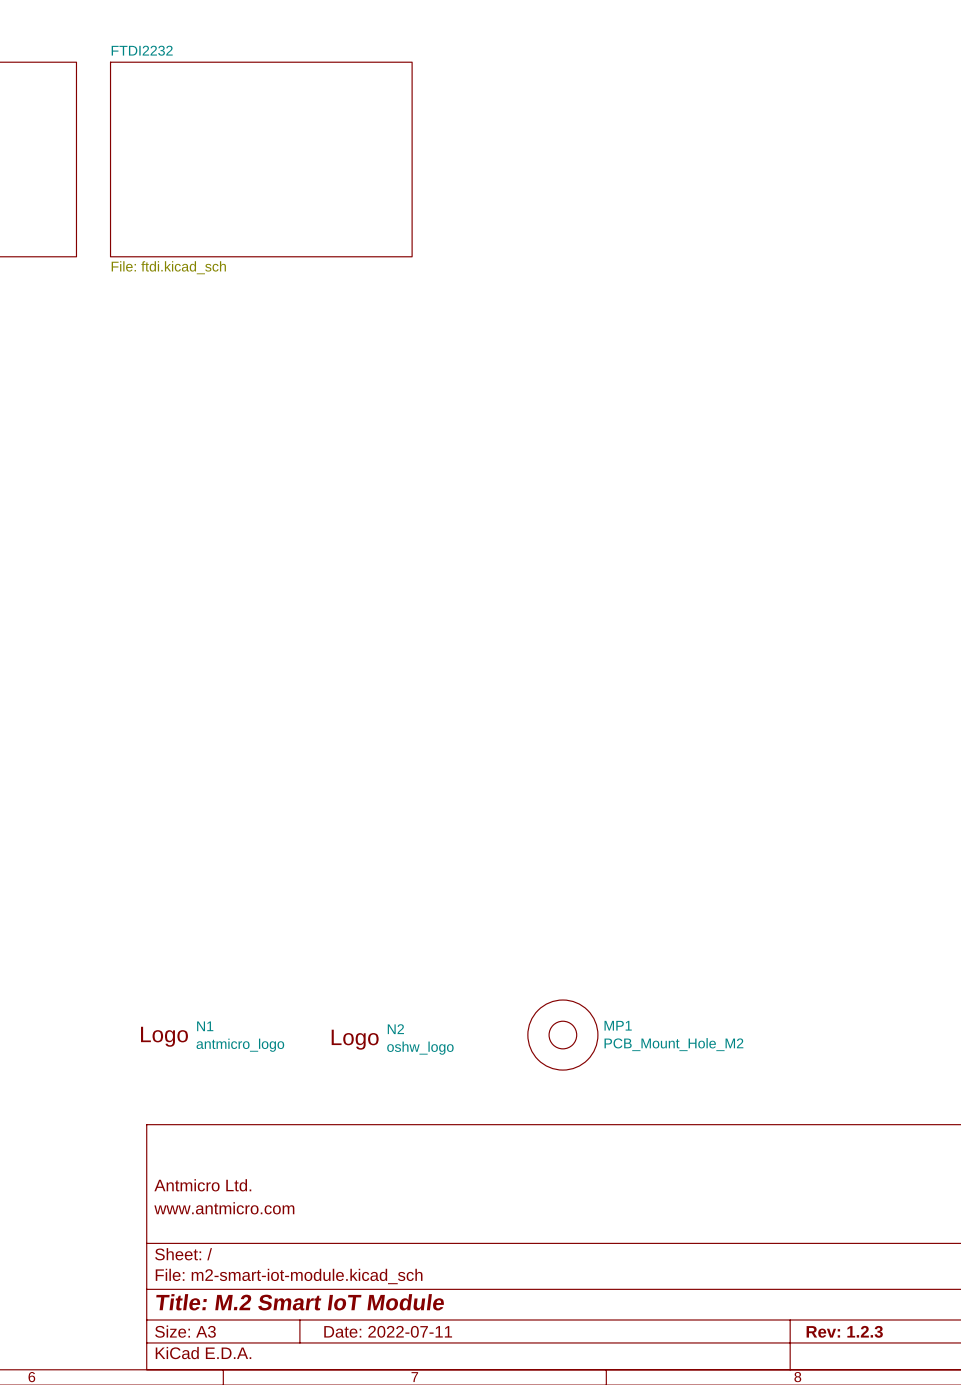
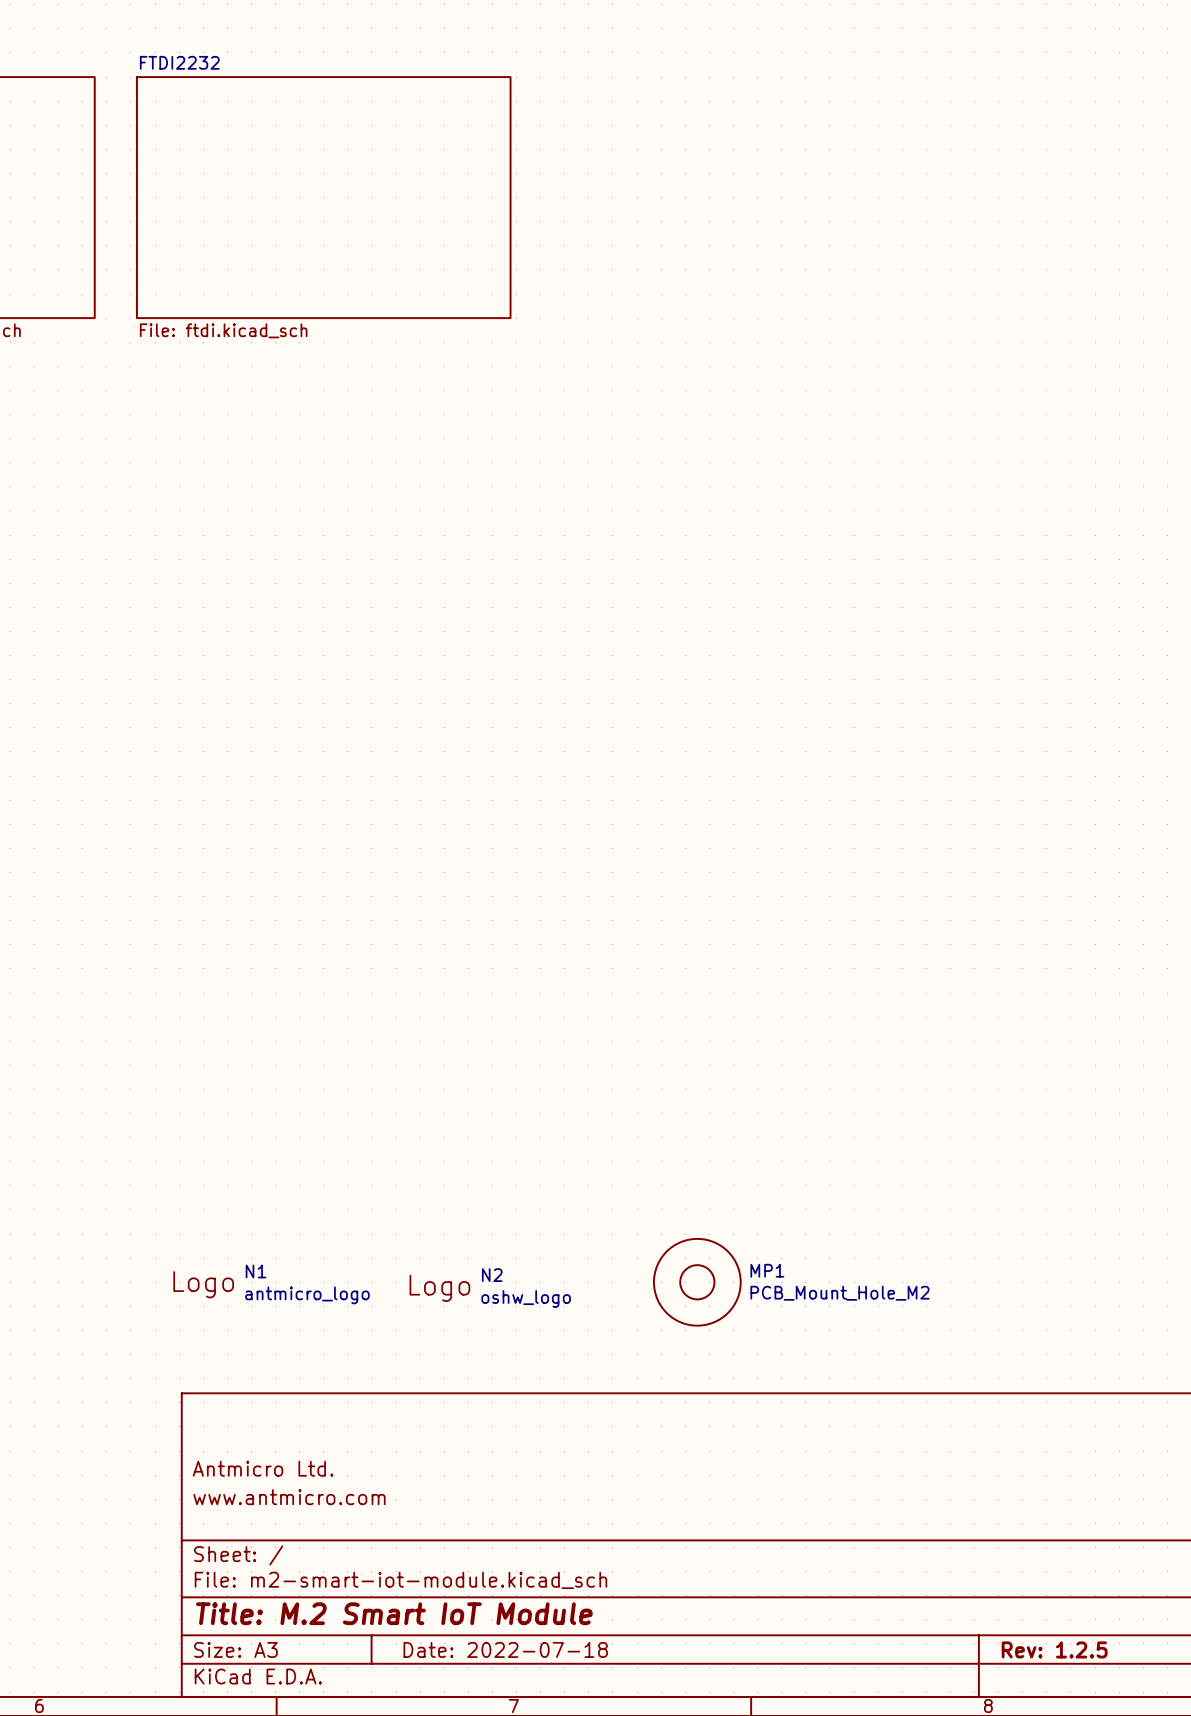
title block: Date: 2022-07-11 (388, 1331) -> Date: 2022-07-18 (505, 1649)
title block: Rev: 1.2.3 (844, 1331) -> Rev: 1.2.5 (1054, 1649)

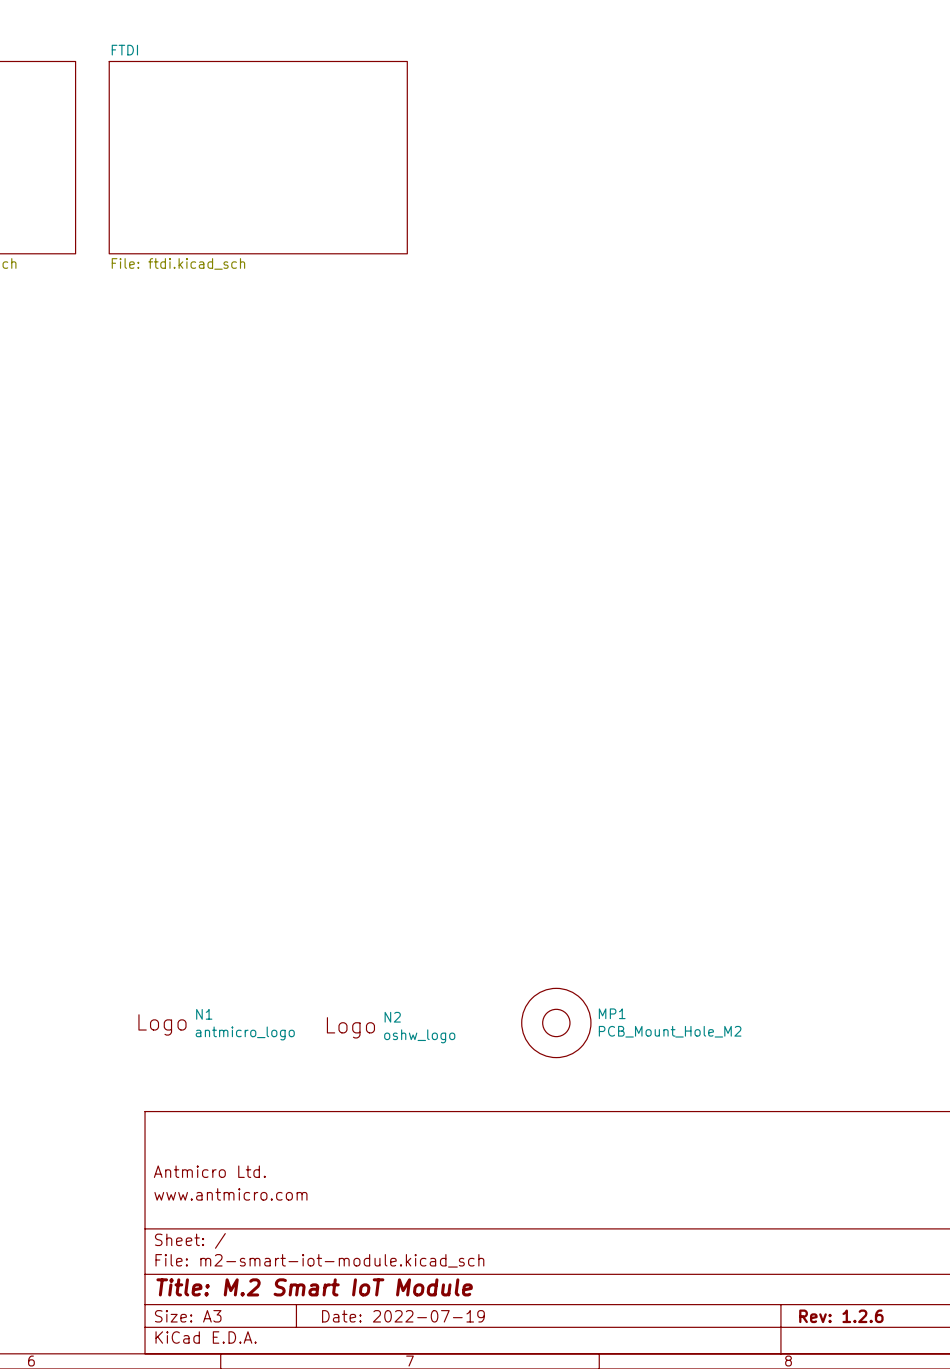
sheet FTDI2232 name: FTDI2232 (179, 62) -> FTDI (124, 50)
title block: Date: 2022-07-18 (505, 1649) -> Date: 2022-07-19 (403, 1316)
title block: Rev: 1.2.5 (1054, 1649) -> Rev: 1.2.6 (841, 1316)

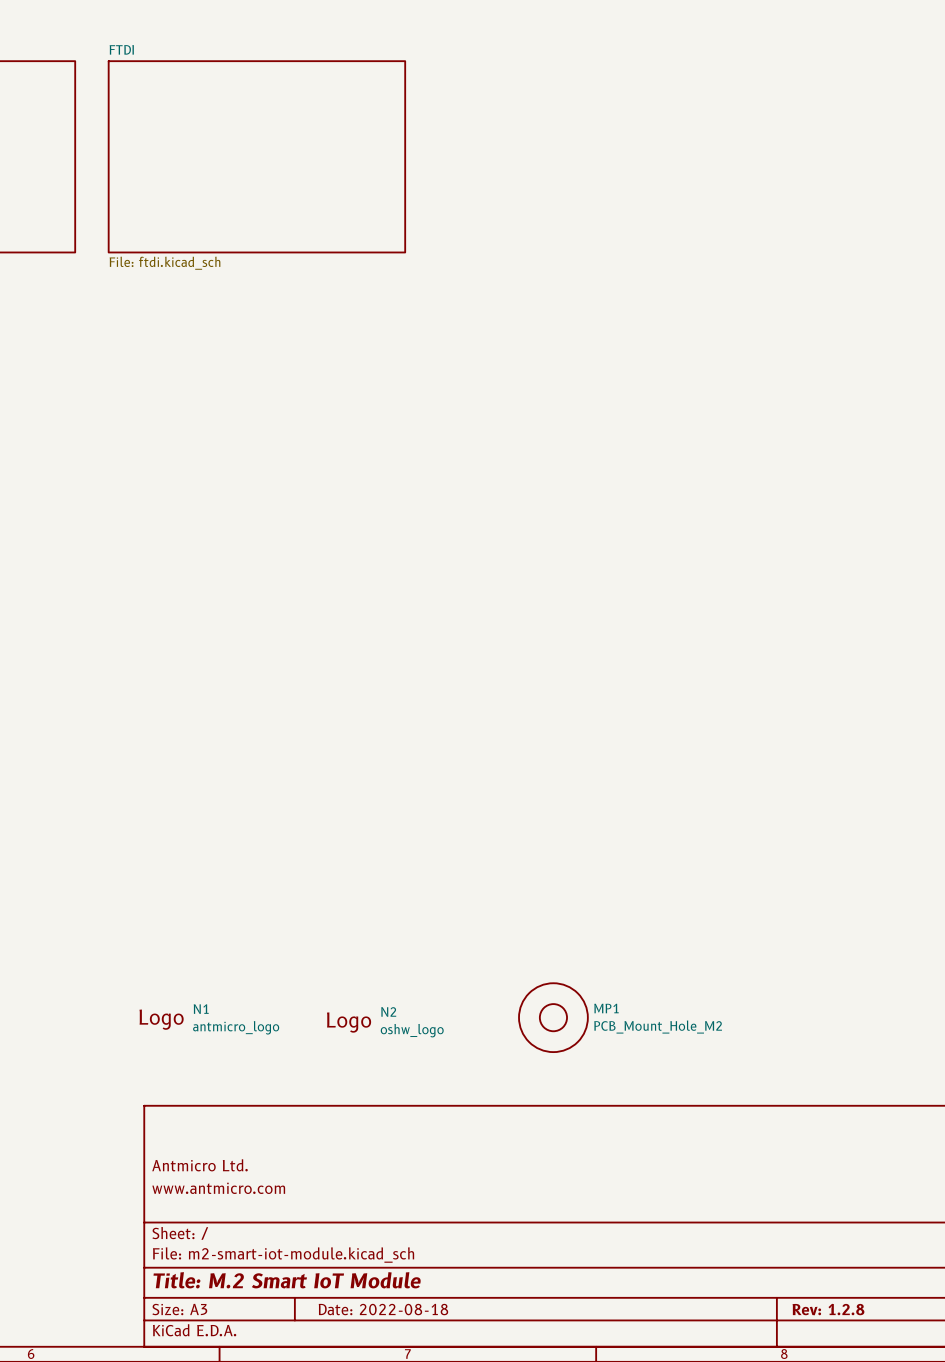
title block: Date: 2022-07-19 (403, 1316) -> Date: 2022-08-18 (383, 1309)
title block: Rev: 1.2.6 (841, 1316) -> Rev: 1.2.8 (828, 1309)

